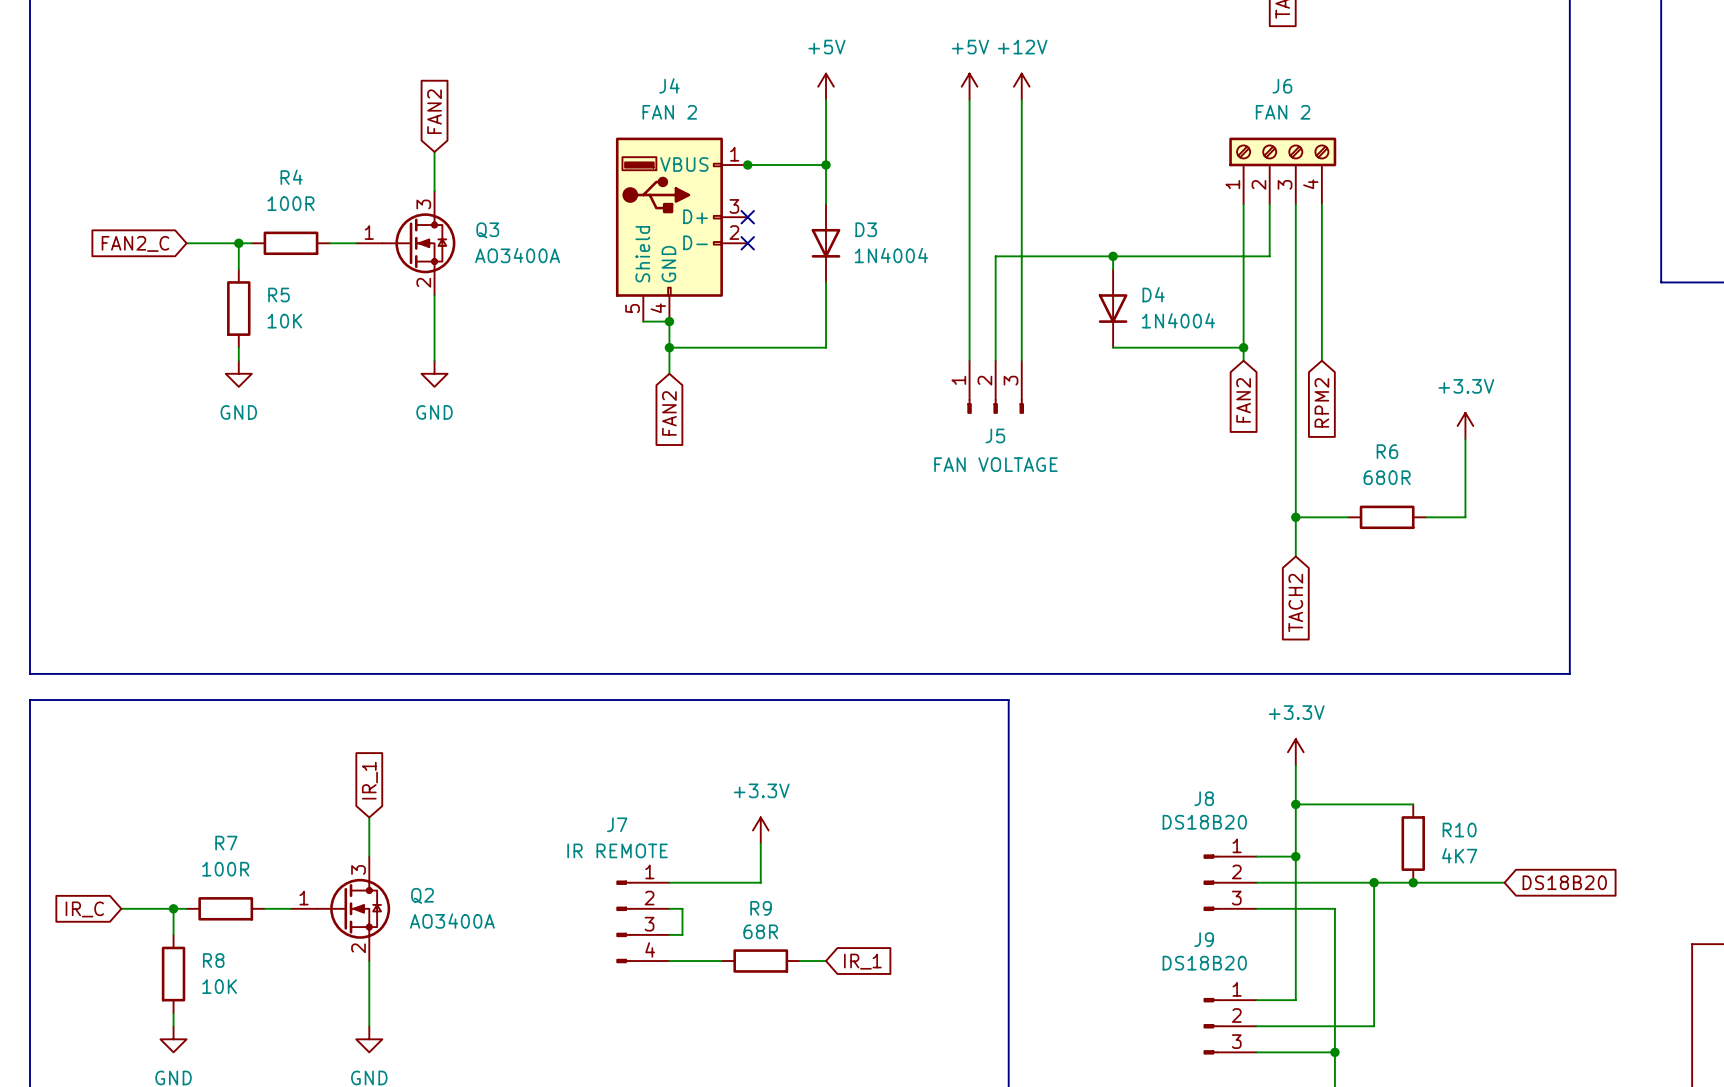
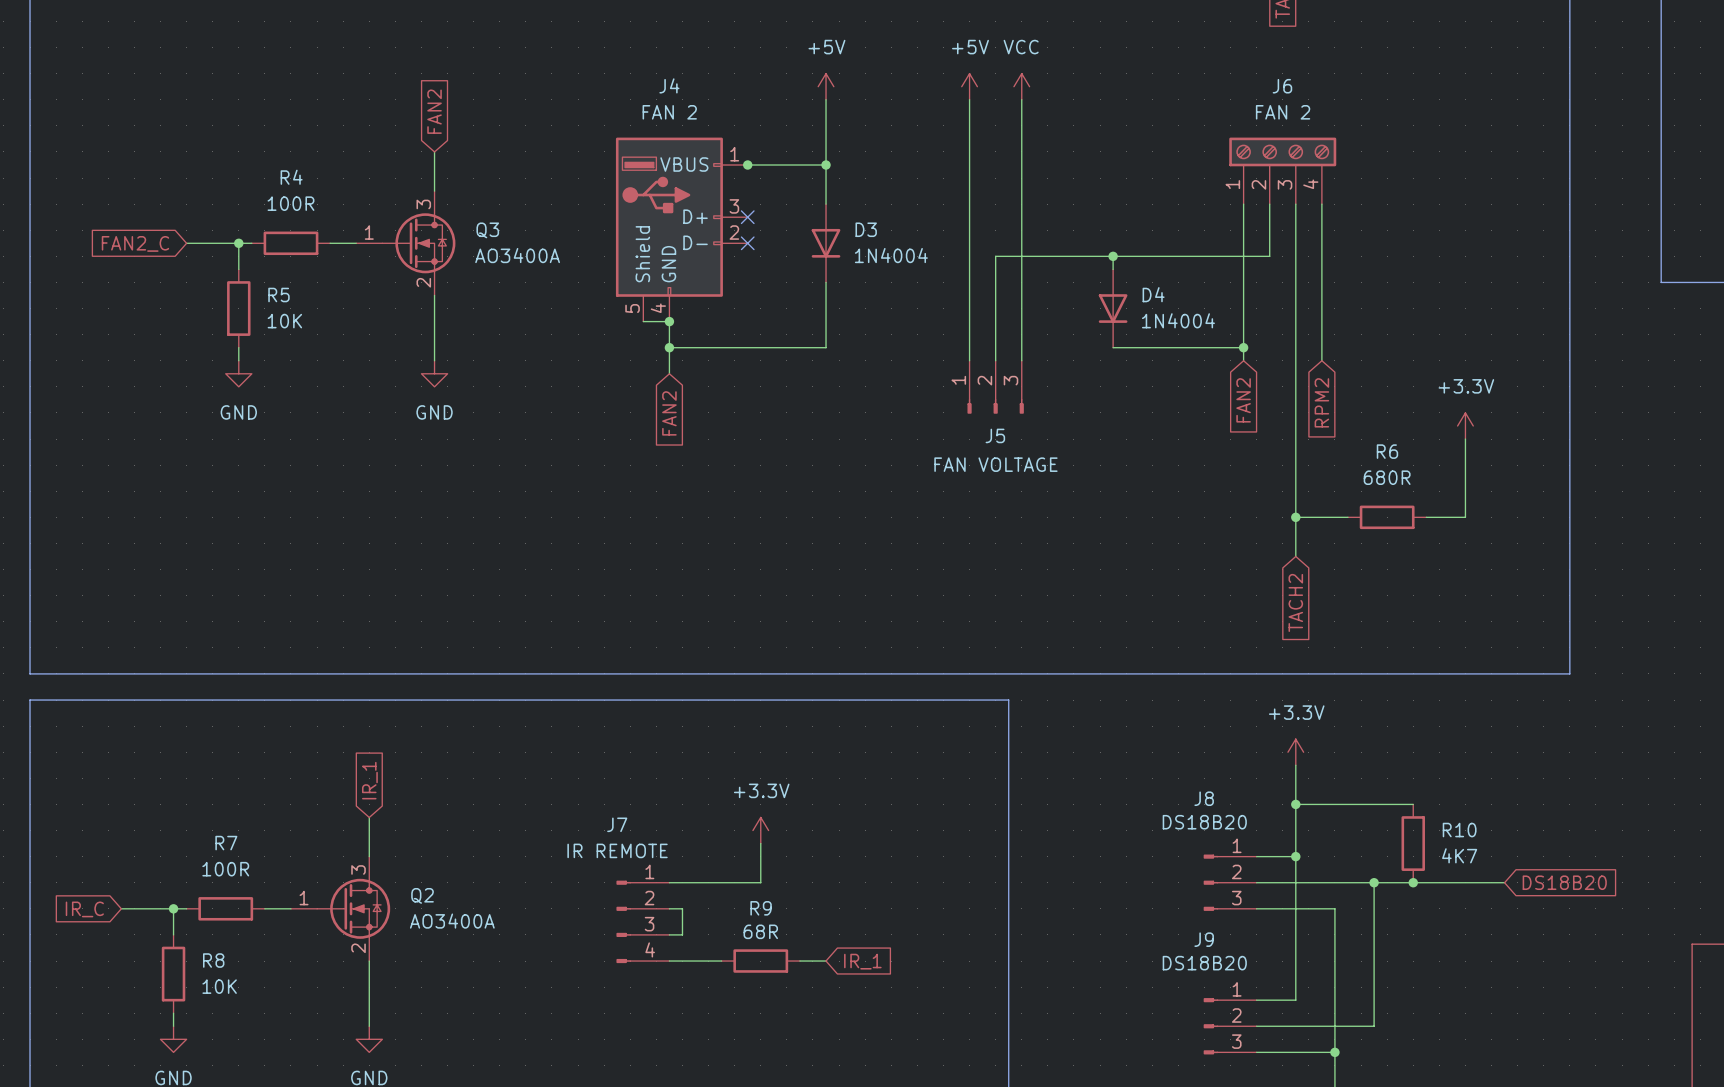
power symbol: +12V (1021, 86) -> VCC (1021, 86)

